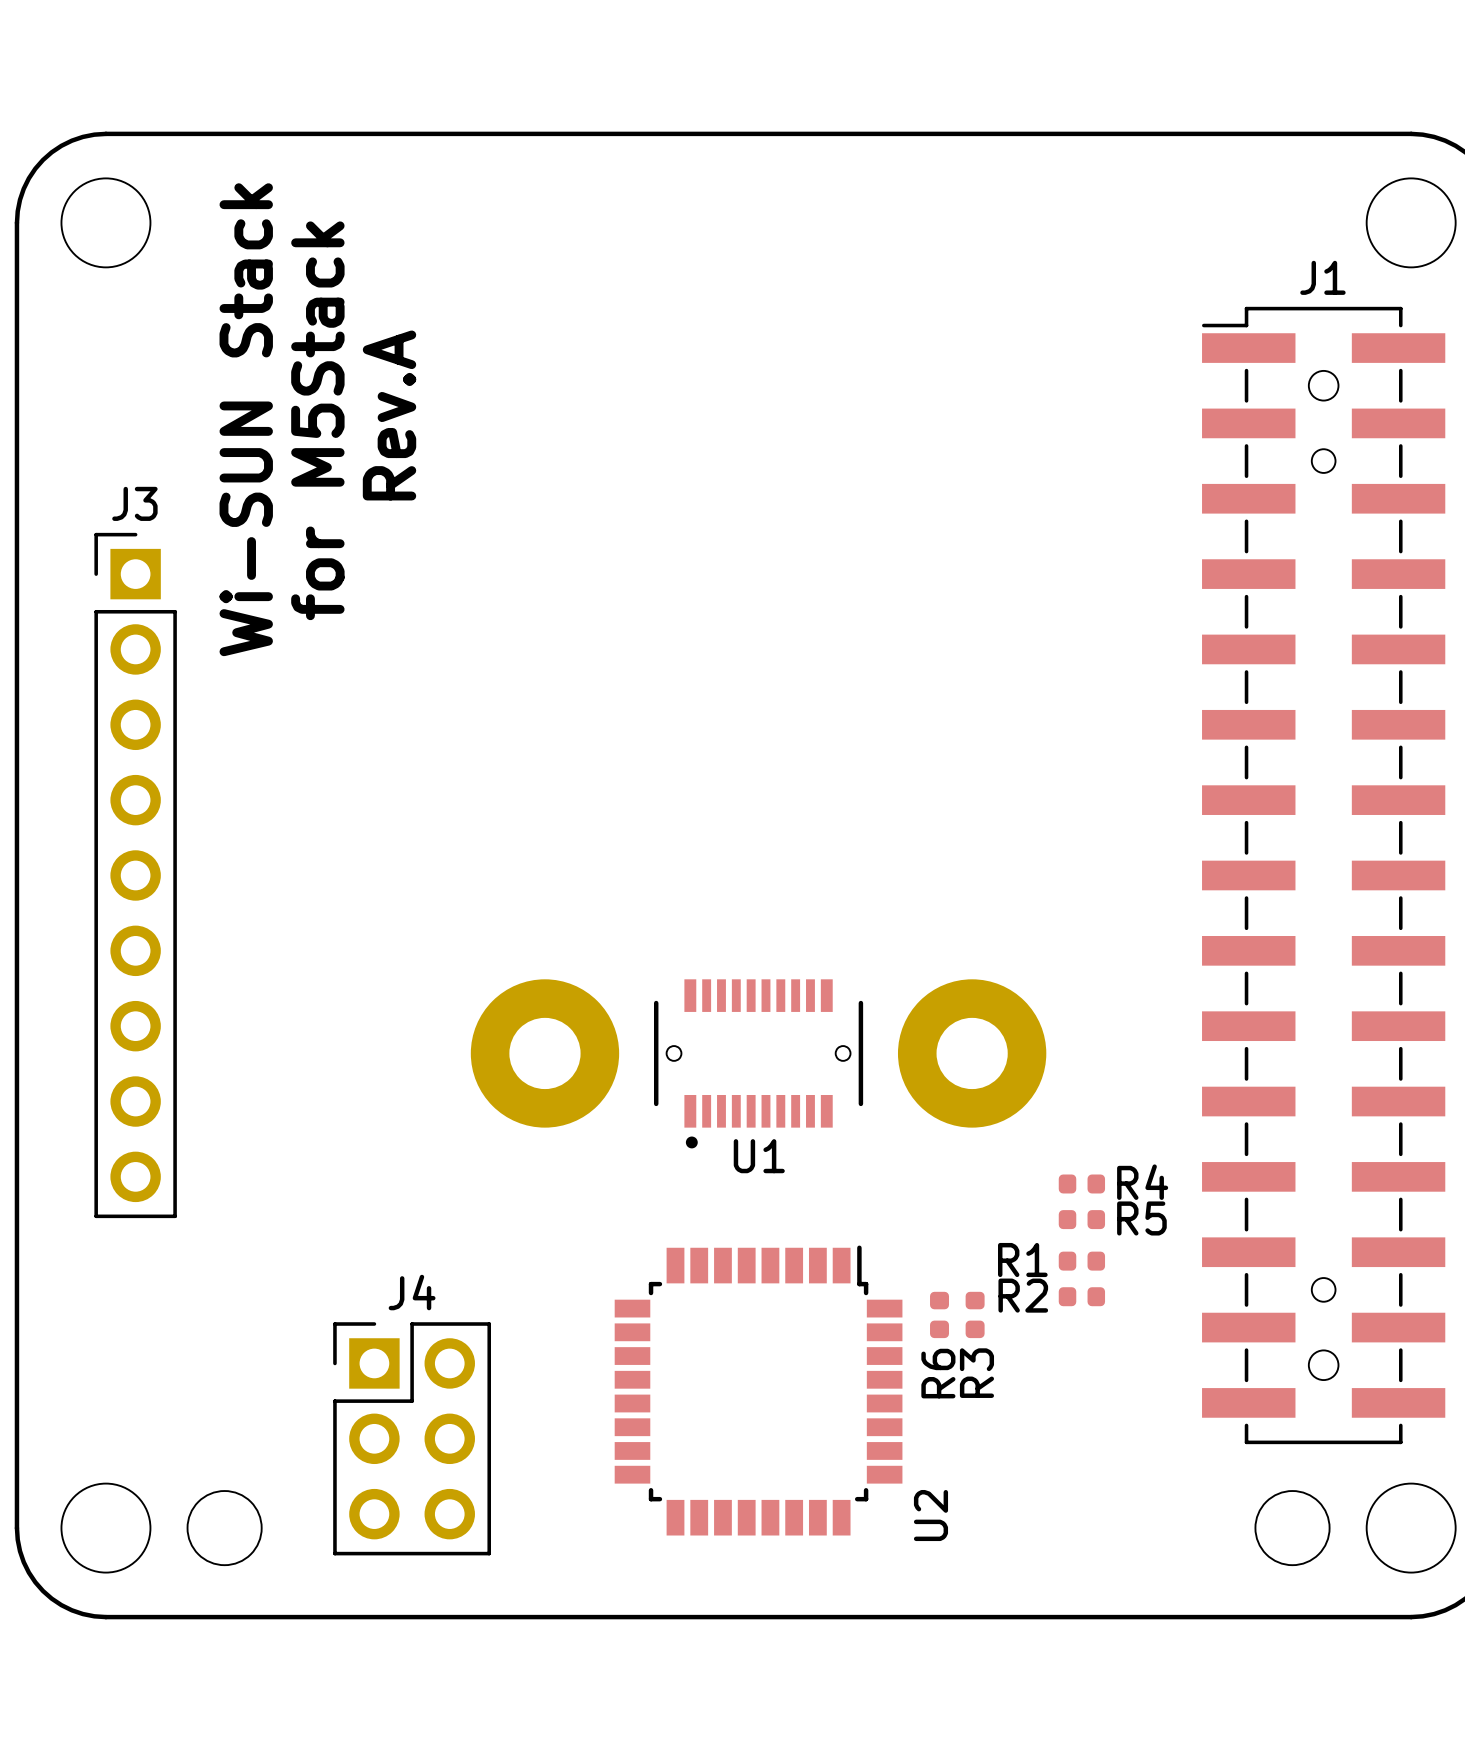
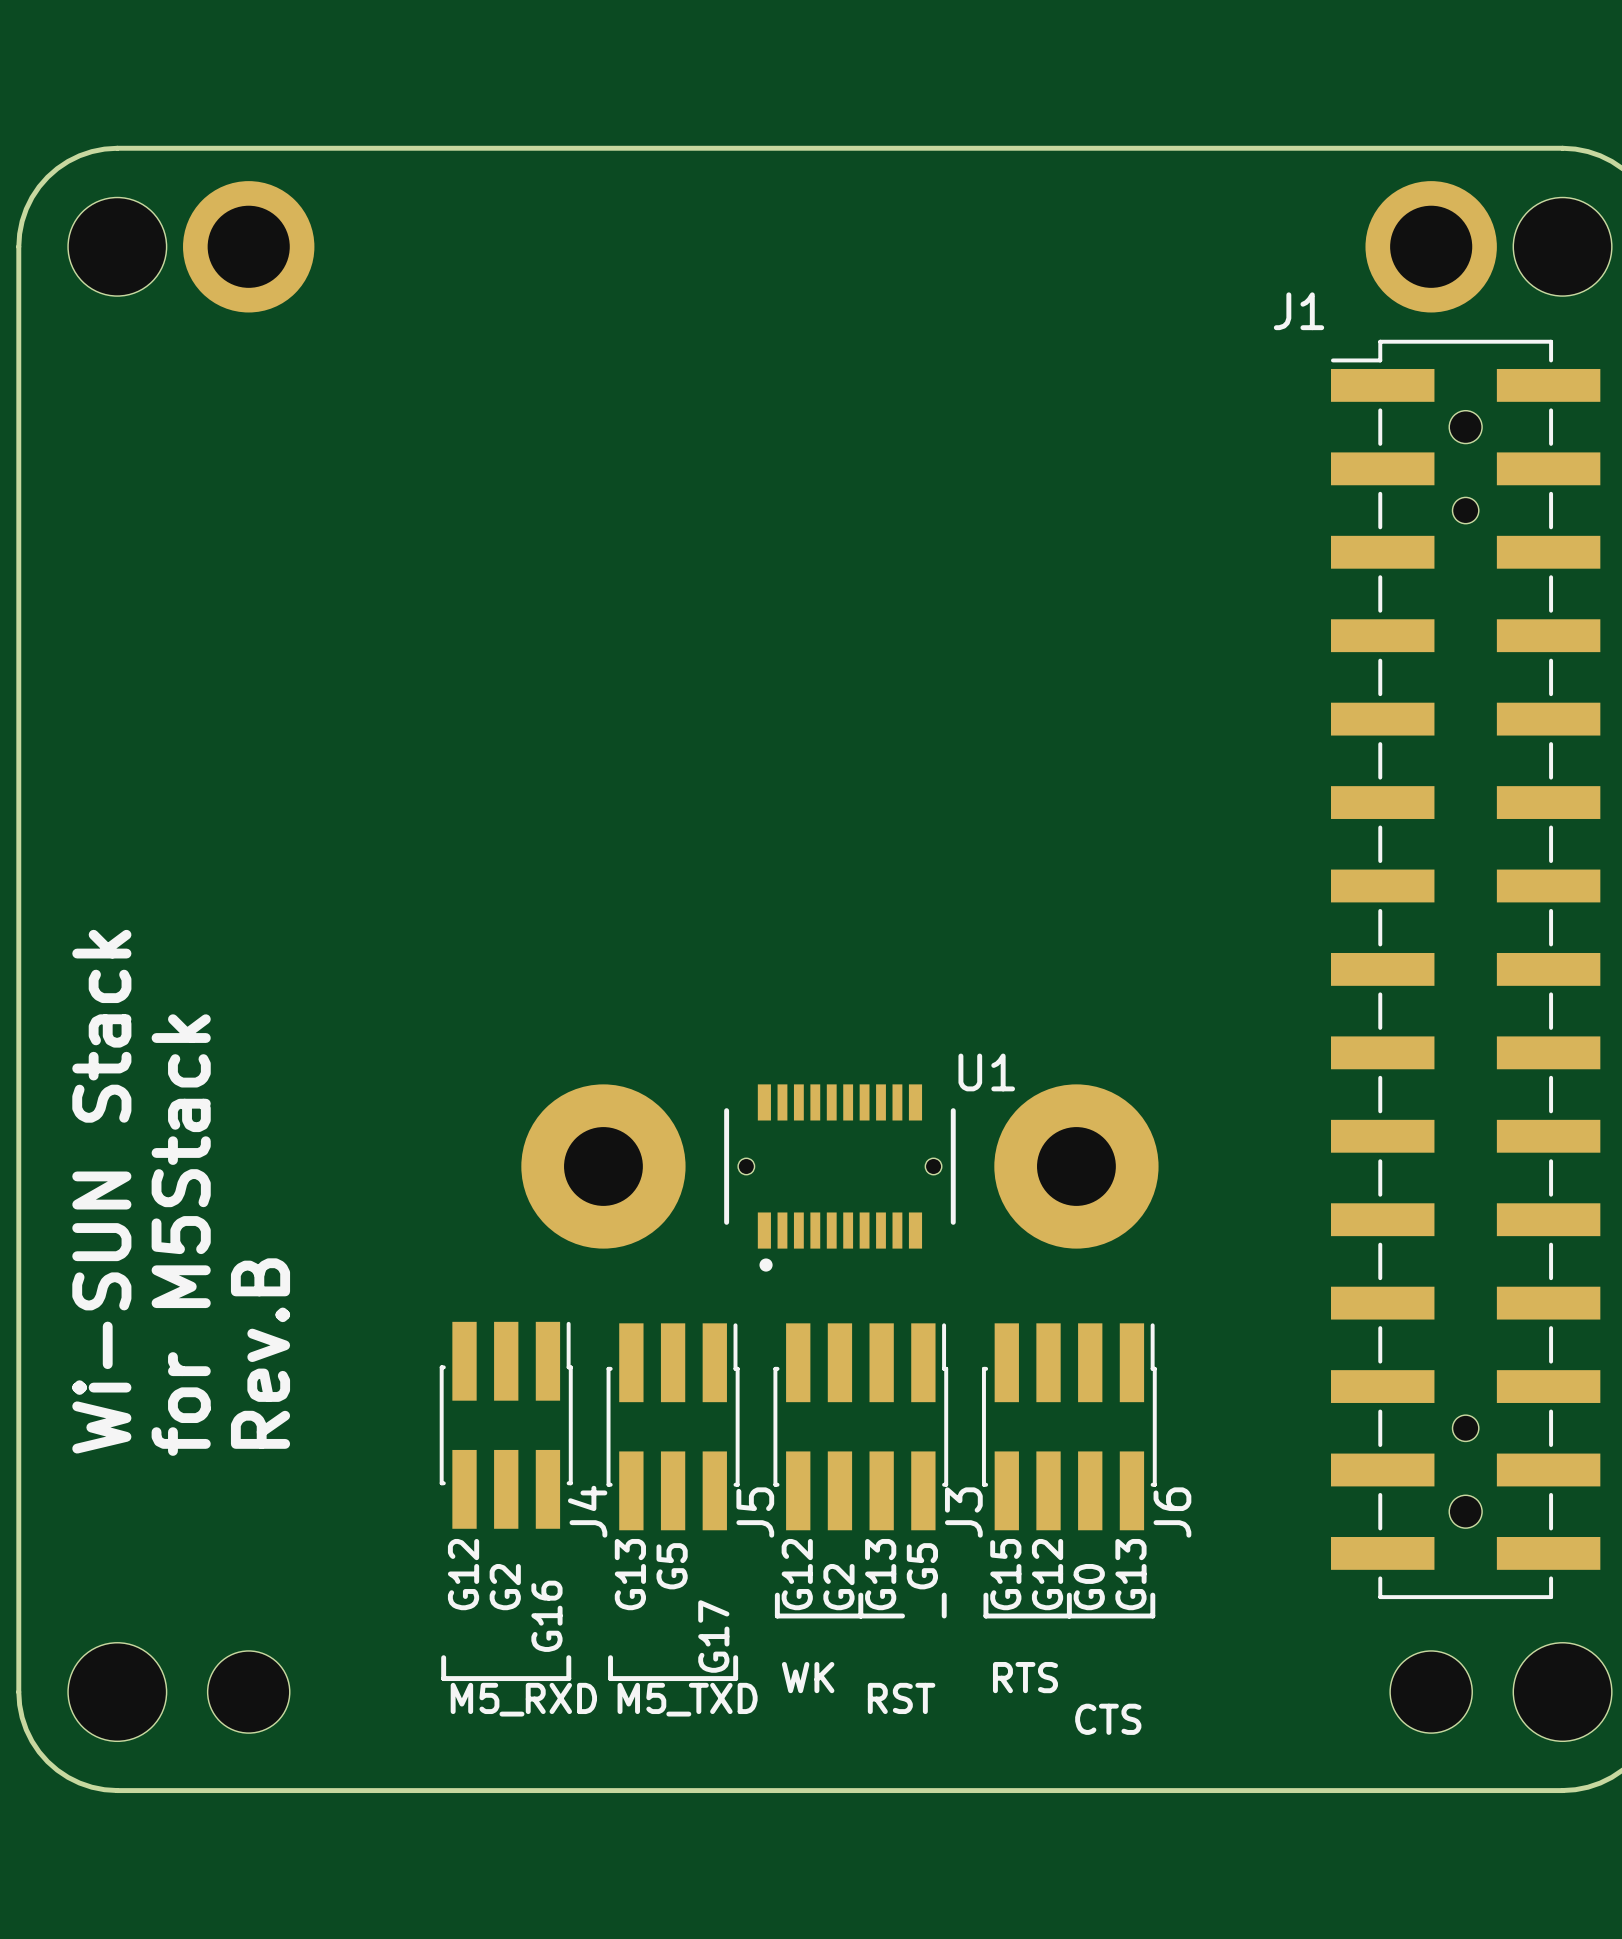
part: none -> (248, 246)
part: none -> (1431, 246)
J1 name position: J1 (1322, 277) -> J1 (1299, 311)
text: Rev.A (389, 415) -> none
text: Wi-SUN Stack (246, 419) -> none
text: for M5Stack (317, 420) -> none
J3 name position: J3 (134, 503) -> J3 (963, 1512)
J3 footprint: [94, 532, 177, 1219] -> [773, 1323, 949, 1531]
text: none -> Wi-SUN Stack (101, 1191)
text: none -> for M5Stack (181, 1235)
U1 name position: U1 (759, 1156) -> U1 (986, 1072)
R4: (1081, 1183) -> none
R5: (1081, 1219) -> none
text: none -> Rev.B (260, 1353)
R1: (1081, 1261) -> none
J5: none -> (673, 1426)
J6: none -> (1069, 1426)
J4 name position: J4 (412, 1292) -> J4 (587, 1511)
R2: (1081, 1296) -> none
R6: (939, 1314) -> none
R3: (975, 1314) -> none
J4 footprint: [333, 1322, 491, 1556] -> [439, 1321, 573, 1529]
U2: (758, 1390) -> none
text: none -> G5 (672, 1566)
text: none -> G5 (922, 1566)
text: none -> G12 (463, 1574)
text: none -> G13 (630, 1574)
text: none -> G12 (797, 1574)
text: none -> G13 (880, 1574)
text: none -> G15 (1005, 1574)
text: none -> G12 (1047, 1574)
text: none -> G13 (1130, 1574)
text: none -> G2 (505, 1587)
text: none -> G2 (838, 1587)
text: none -> G0 (1089, 1587)
line: none -> (777, 1595) (777, 1615) (902, 1615)
line: none -> (860, 1595) (860, 1615)
line: none -> (944, 1595) (944, 1615)
line: none -> (985, 1595) (985, 1615) (1152, 1615) (1152, 1595)
line: none -> (1069, 1595) (1069, 1615)
text: none -> G16 (546, 1616)
text: none -> G17 (713, 1636)
line: none -> (443, 1657) (443, 1678) (568, 1678) (568, 1657)
line: none -> (610, 1657) (610, 1678) (735, 1678) (735, 1657)
text: none -> WK (808, 1677)
text: none -> RTS (1025, 1677)
text: none -> RST (901, 1698)
text: none -> M5_RXD (523, 1699)
text: none -> M5_TXD (687, 1699)
text: none -> CTS (1108, 1719)

